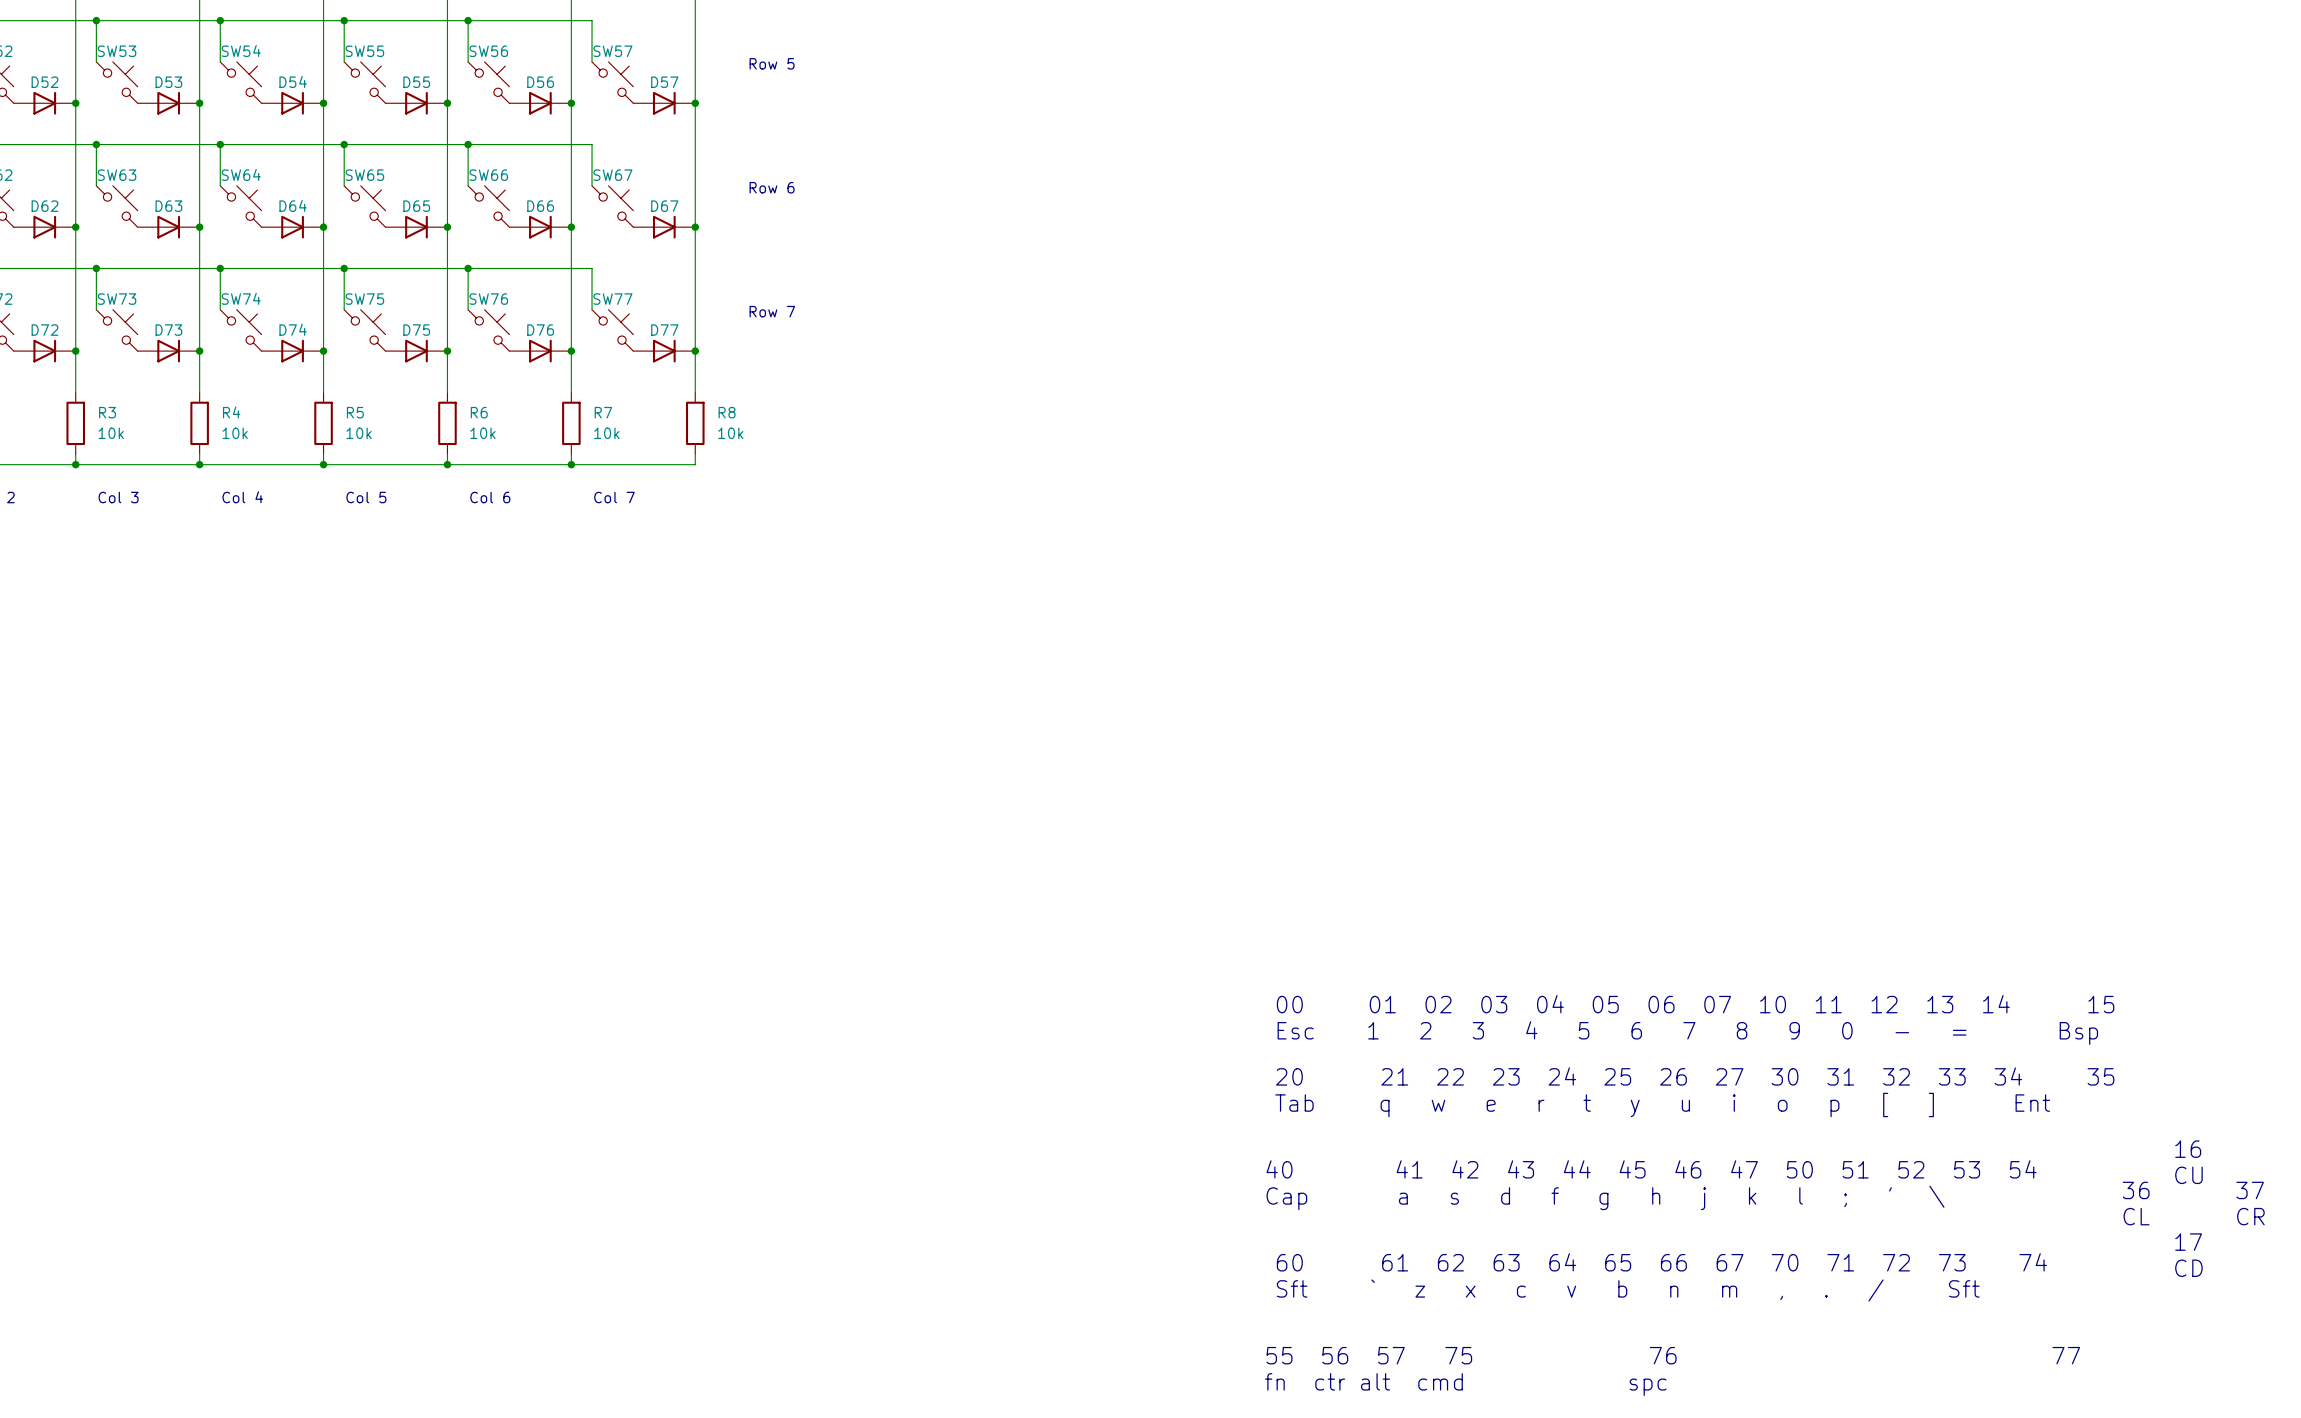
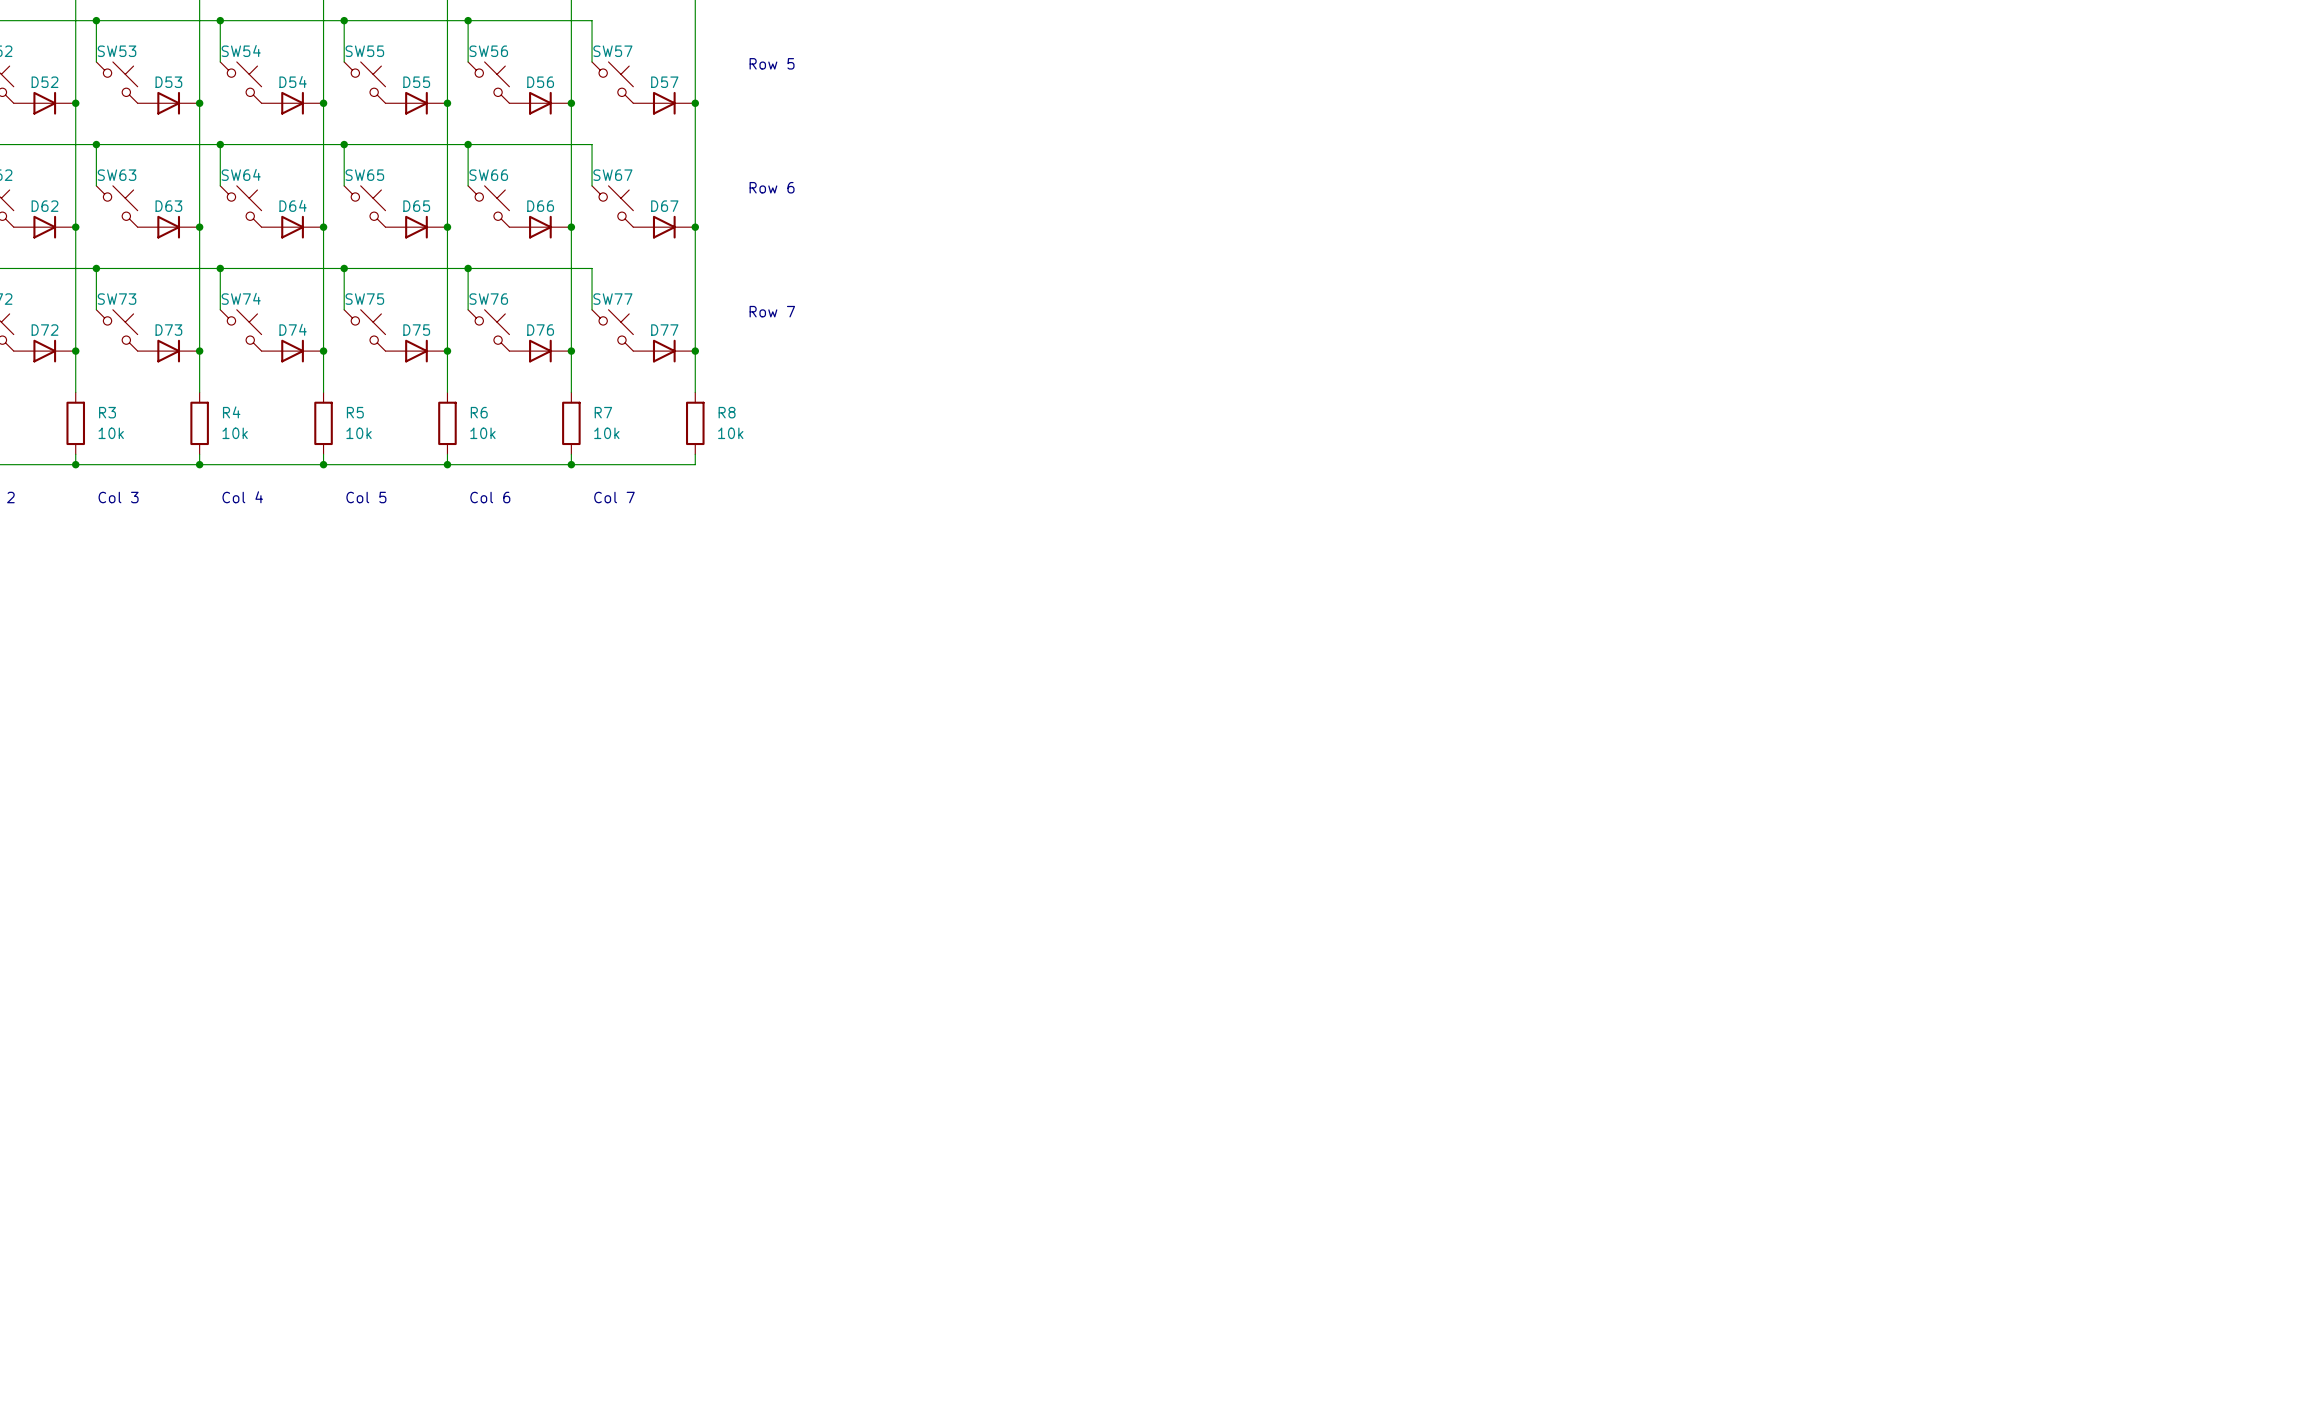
text: 00 01 02 03 04 05 06 07 10 11 12 13 14 15 (1695, 1004) -> none
text: Esc 1 2 3 4 5 6 7 8 9 0 - = Bsp (1687, 1033) -> none
text: 20 21 22 23 24 25 26 27 30 31 32 33 34 35 (1695, 1076) -> none
text: Tab q w e r t y u i o p [ ] Ent (1662, 1104) -> none
text: 16 (2188, 1149) -> none
text: 40 41 42 43 44 45 46 47 50 51 52 53 54 (1651, 1169) -> none
text: CU (2188, 1175) -> none
text: 36 (2136, 1190) -> none
text: 37 (2250, 1190) -> none
text: Cap a s d f g h j k l ; ' \ (1605, 1197) -> none
text: CL (2136, 1216) -> none
text: CR (2250, 1216) -> none
text: 17 (2188, 1242) -> none
text: 60 61 62 63 64 65 66 67 70 71 72 73 74 (1661, 1262) -> none
text: CD (2188, 1268) -> none
text: Sft ` z x c v b n m , . / Sft (1628, 1290) -> none
text: 55 56 57 75 76 77 (1673, 1355) -> none
text: fn ctr alt cmd spc (1465, 1384) -> none

